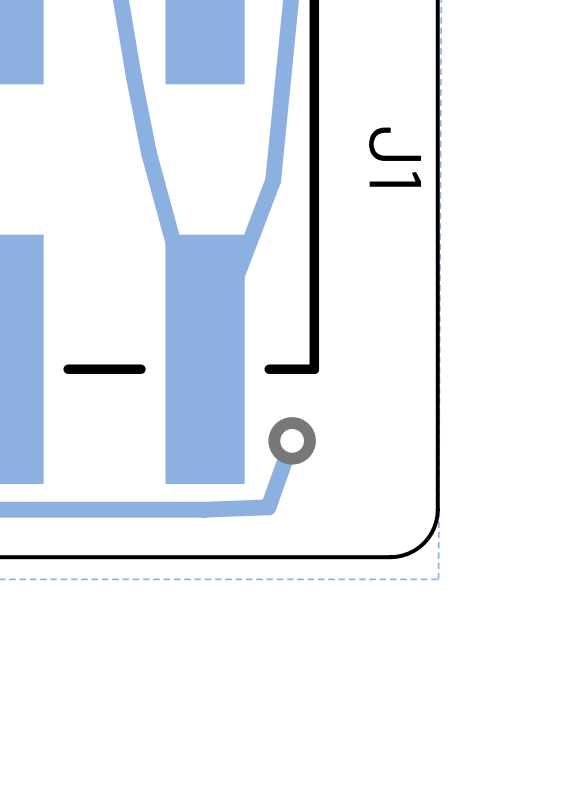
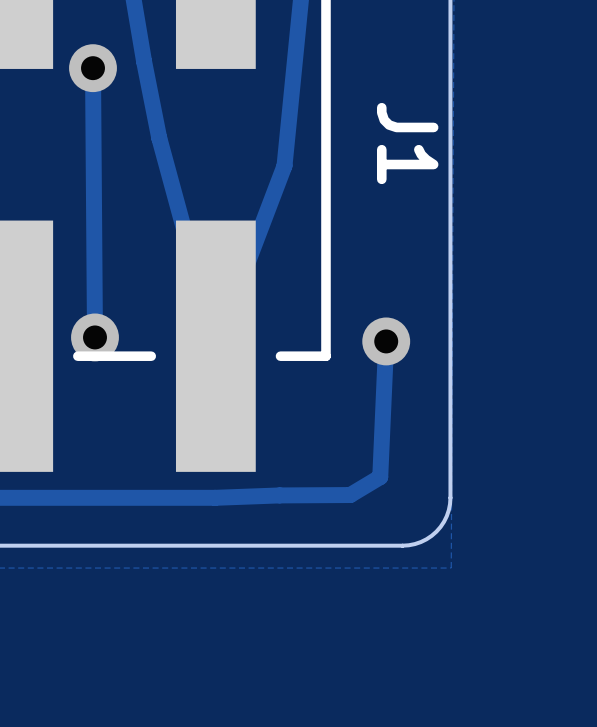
track: none -> (93, 68) (94, 337)
via: none -> (93, 68)
via: none -> (94, 337)
via: none -> (386, 341)
track: (292, 440) (268, 507) -> (386, 341) (380, 477) (350, 495) (279, 495)
via: (292, 440) -> none

